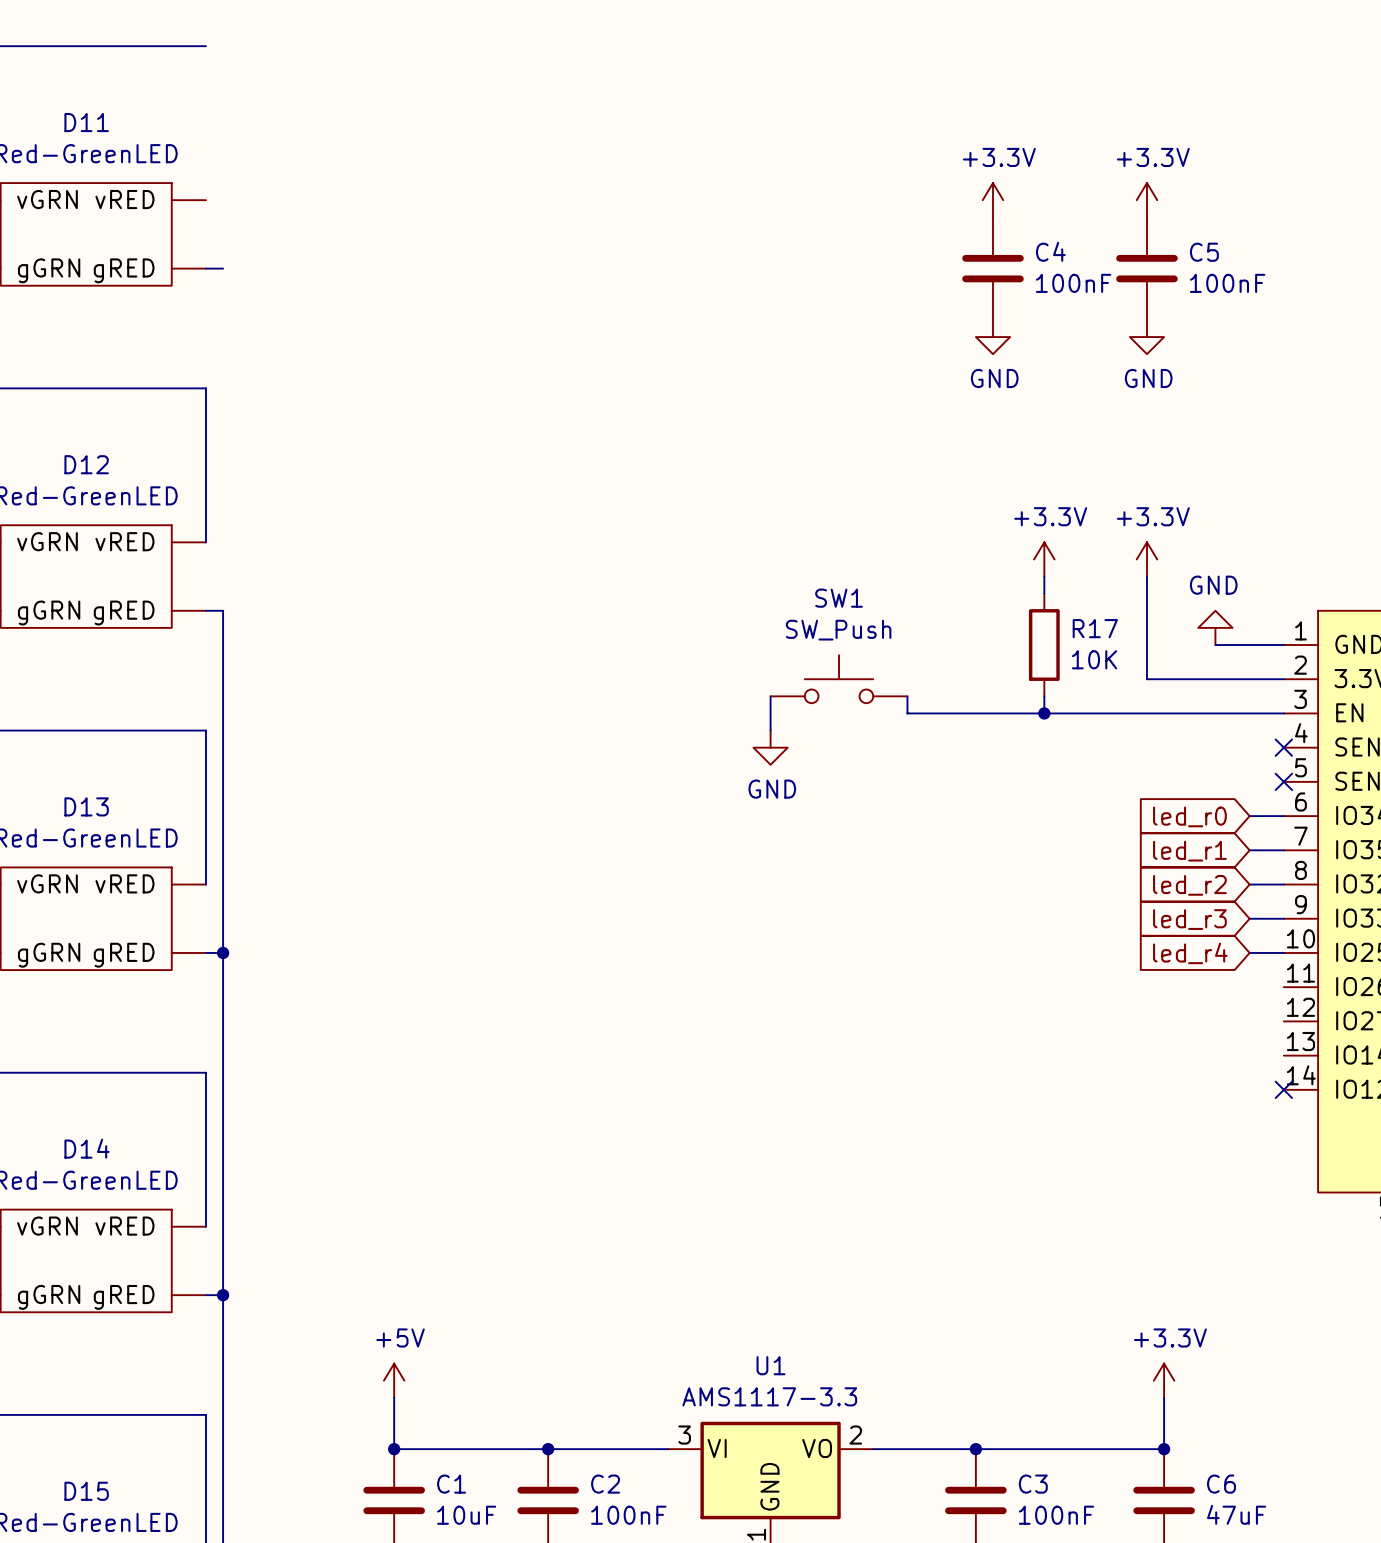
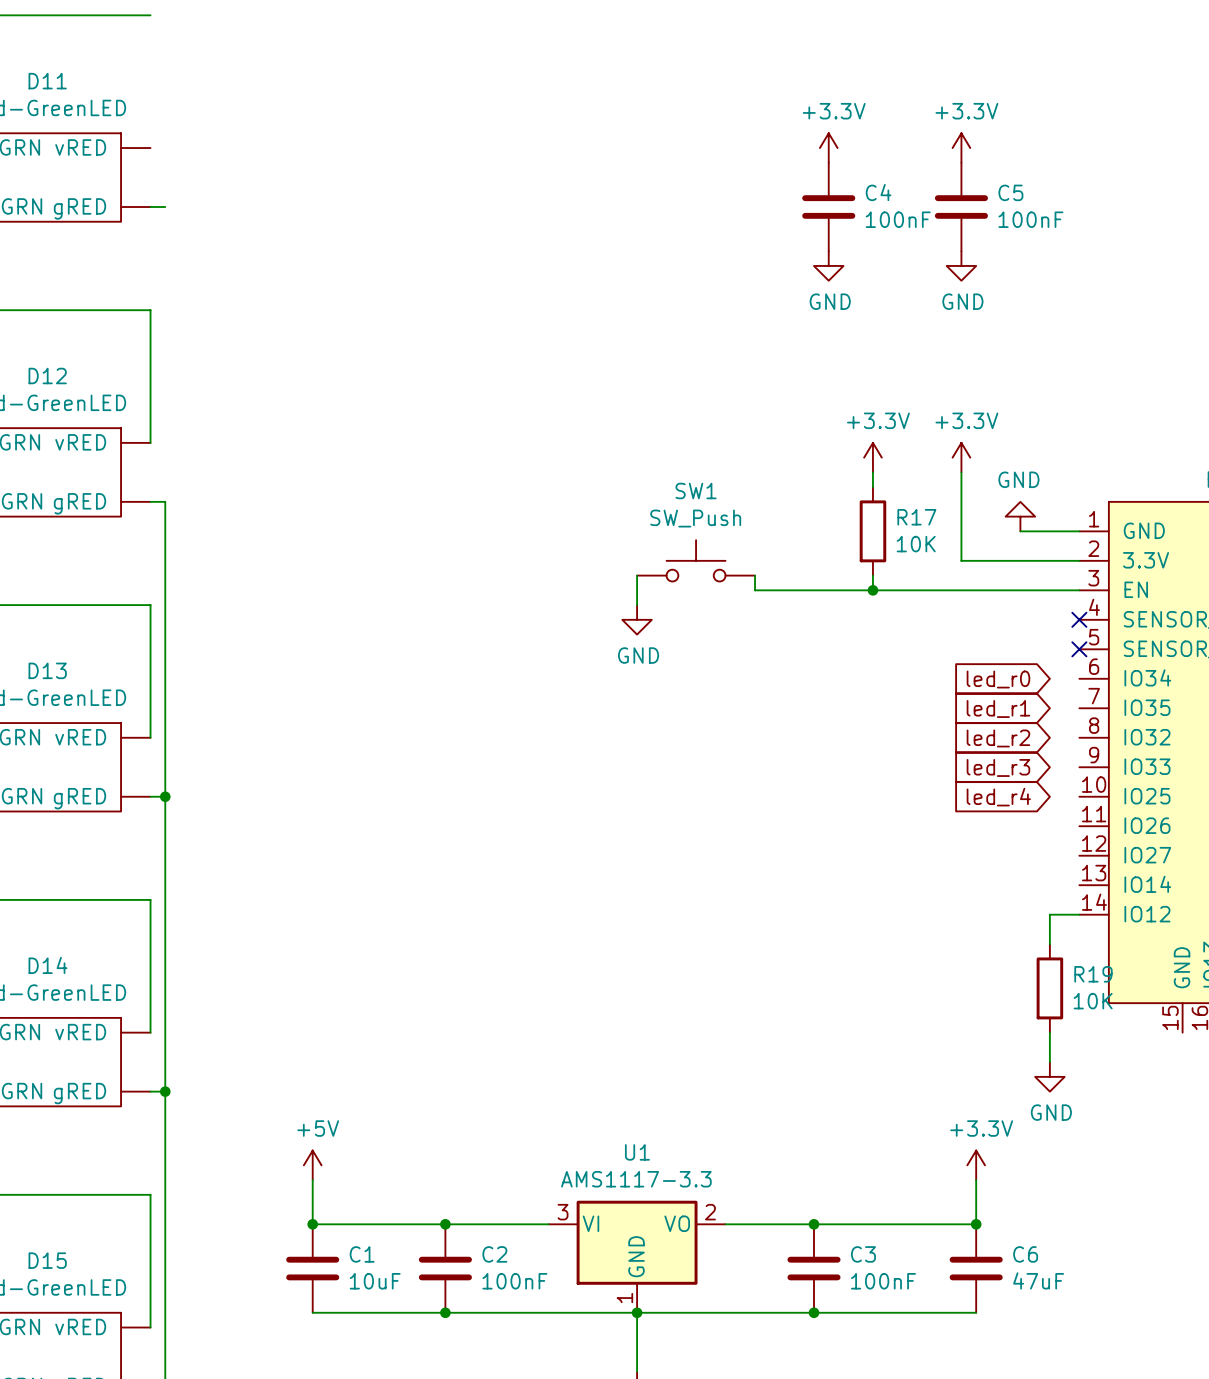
wire: (1249, 816) (1283, 816) -> none
wire: (1249, 850) (1283, 850) -> none
wire: (1249, 884) (1283, 884) -> none
wire: (1249, 918) (1283, 918) -> none
wire: (1249, 952) (1283, 952) -> none
wire: none -> (1079, 914) (1049, 914) (1049, 944)
no-connect mark: (1283, 1089) -> none
R19: none -> 10K (1049, 988)
wire: none -> (1049, 1032) (1049, 1062)
power symbol: none -> GND (1049, 1076)

